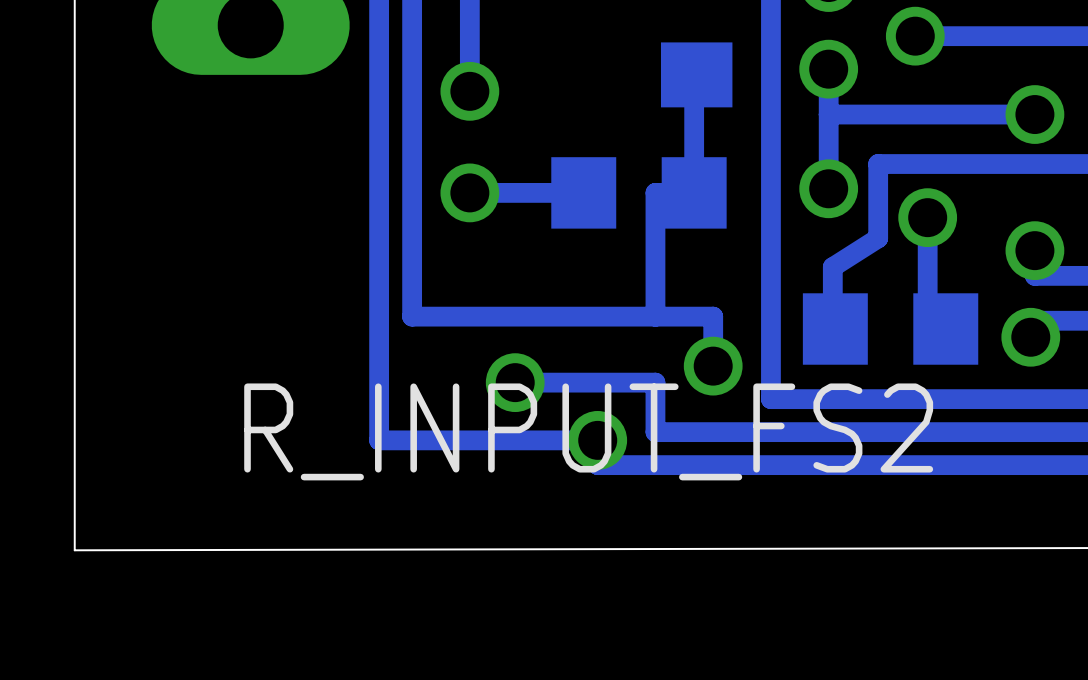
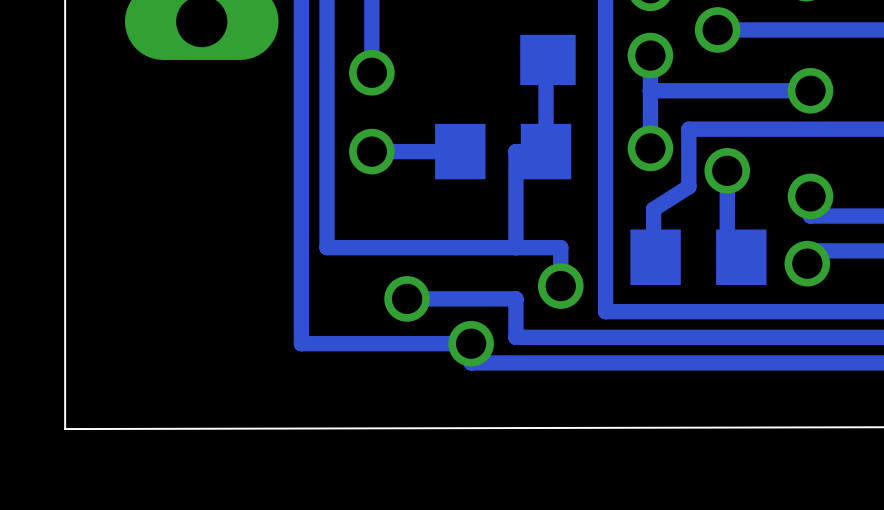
R_INPUT_FS2 name: R_INPUT_FS2 (588, 431) -> none

